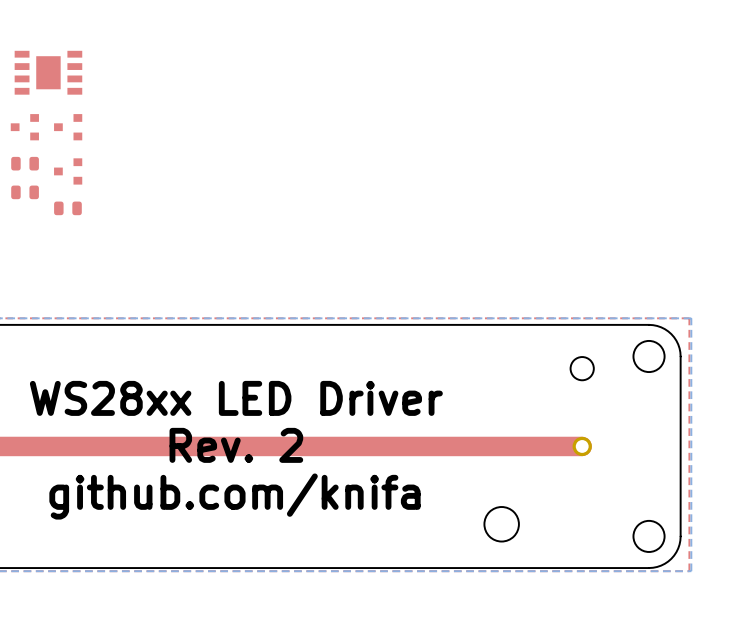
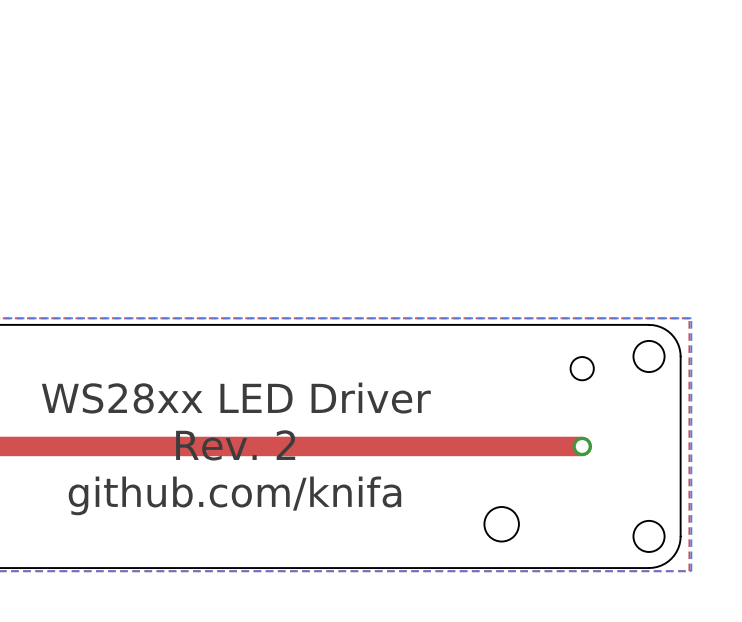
part: (48, 72) -> none
part: (24, 127) -> none
part: (68, 127) -> none
part: (25, 163) -> none
part: (68, 171) -> none
part: (25, 192) -> none
part: (67, 208) -> none

